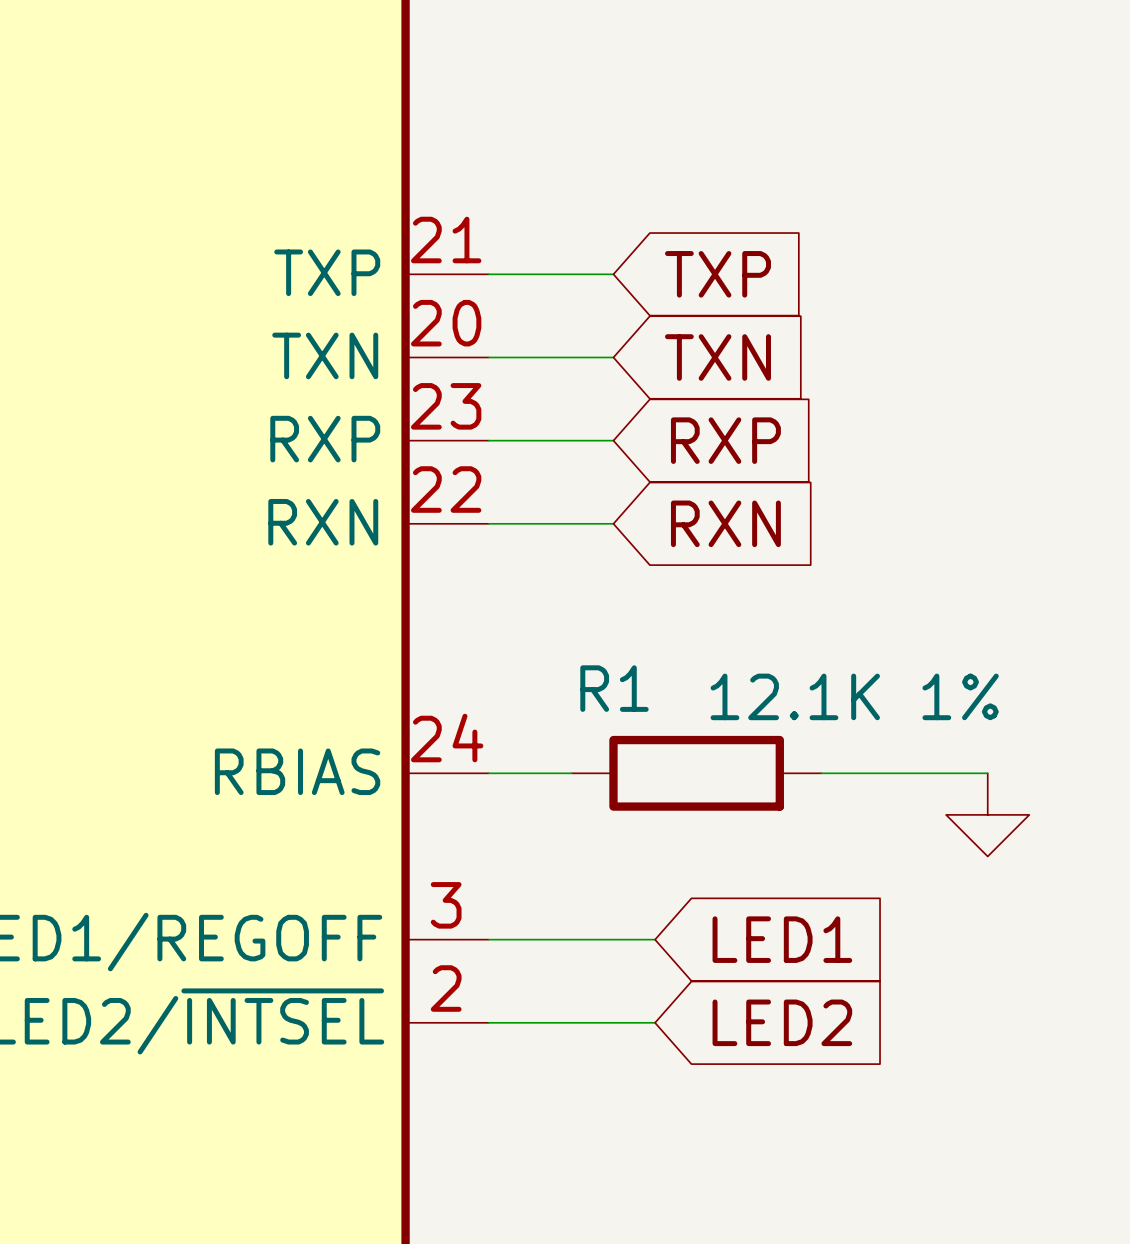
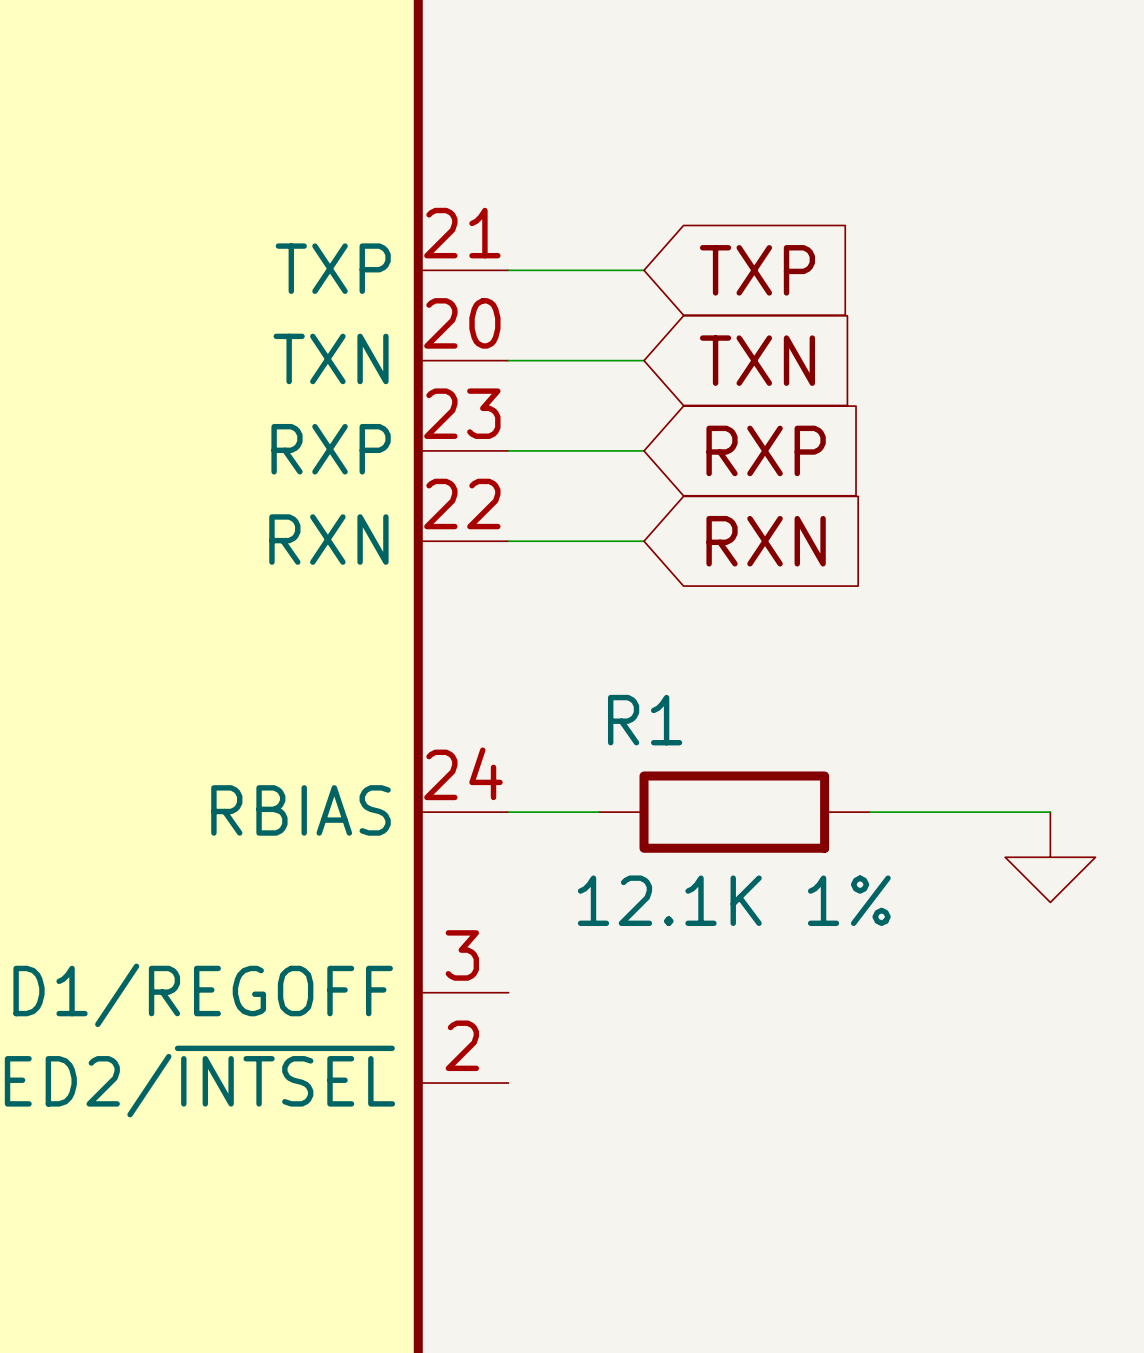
R1 value position: 12.1K 1% (854, 696) -> 12.1K 1% (734, 900)
wire: (488, 939) (655, 939) -> none
global label: LED1 (782, 939) -> none
wire: (488, 1022) (655, 1022) -> none
global label: LED2 (782, 1022) -> none

